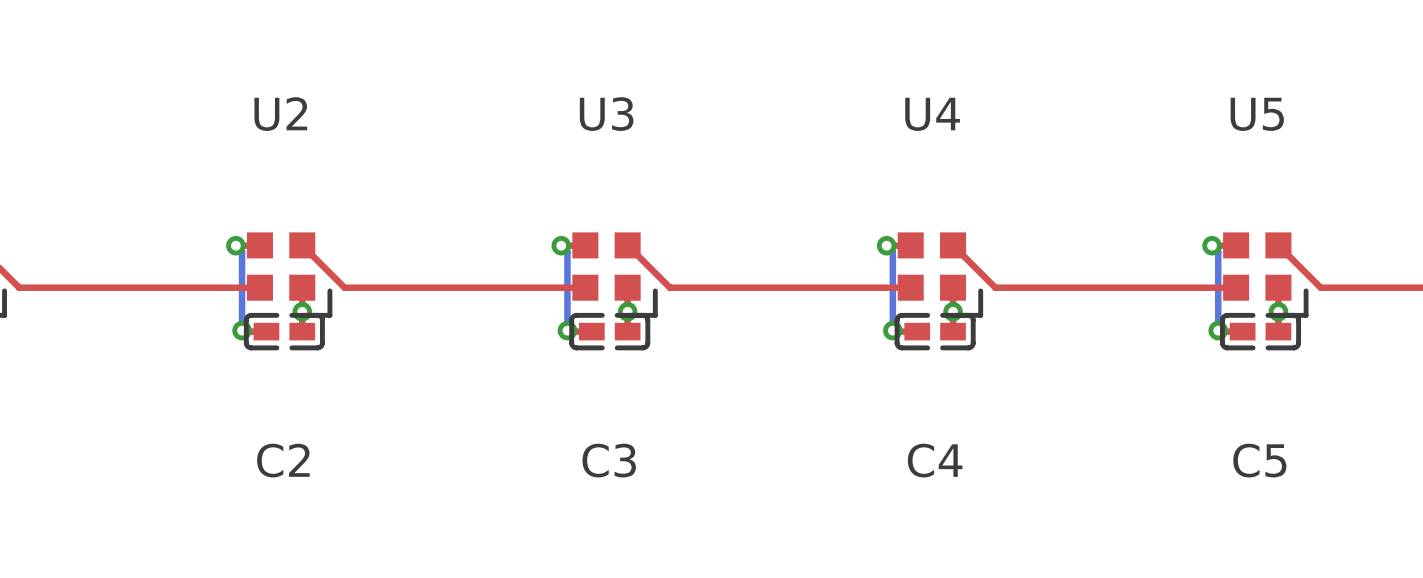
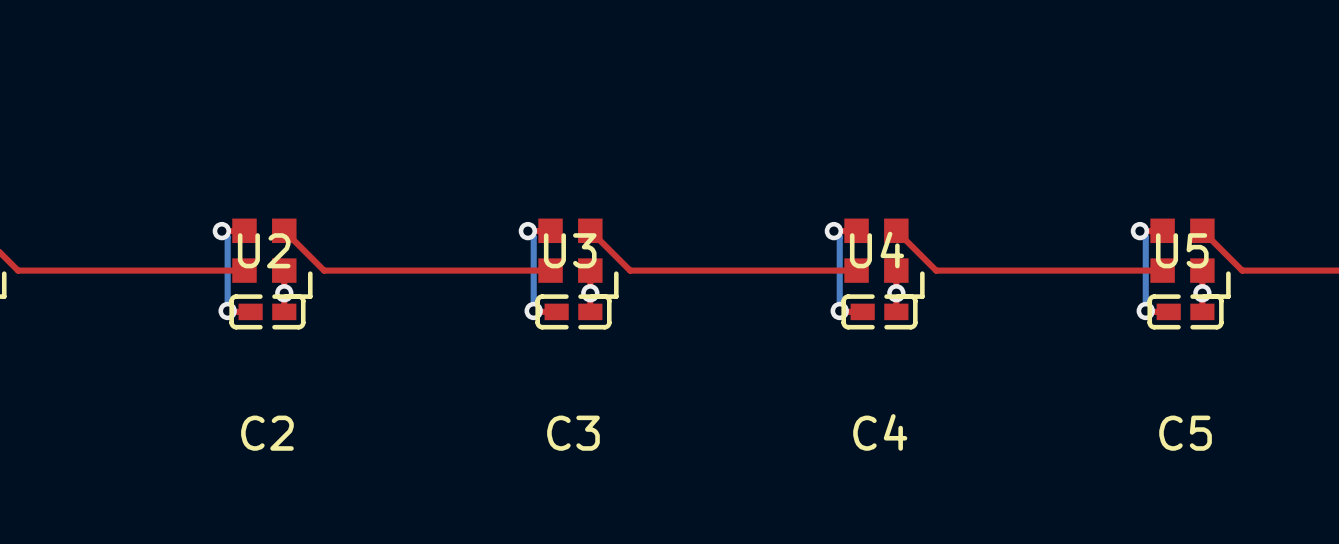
U2 name position: U2 (280, 114) -> U2 (264, 250)
U3 name position: U3 (606, 114) -> U3 (570, 250)
U4 name position: U4 (932, 114) -> U4 (877, 250)
U5 name position: U5 (1257, 114) -> U5 (1182, 250)

